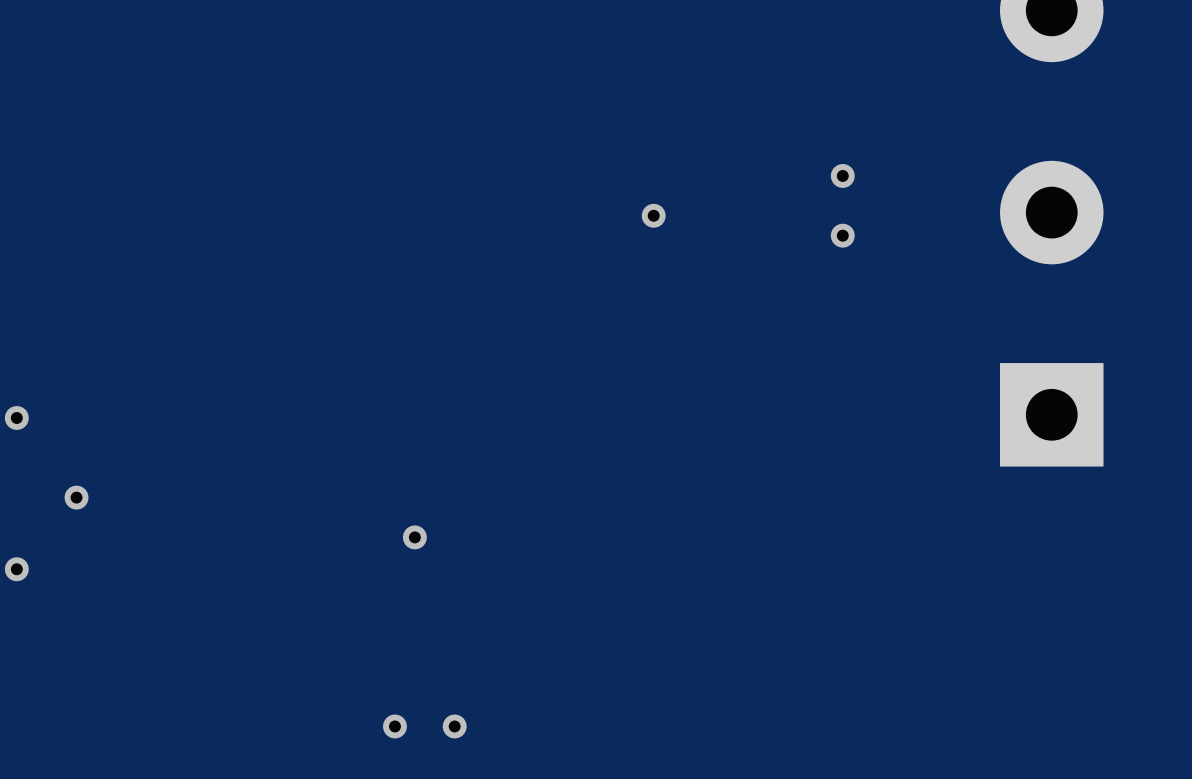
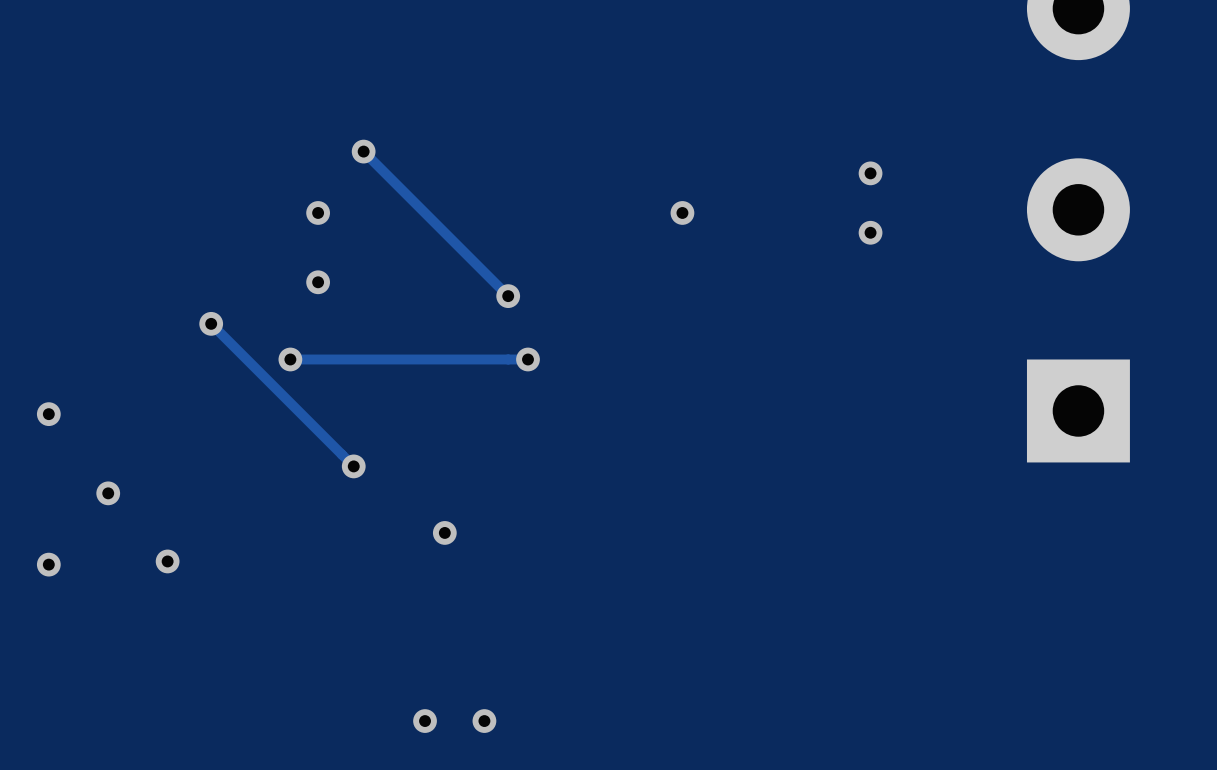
track: none -> (363, 151) (508, 296)
via: none -> (363, 151)
via: none -> (318, 212)
via: none -> (318, 282)
via: none -> (508, 296)
track: none -> (211, 323) (353, 466)
via: none -> (211, 323)
via: none -> (290, 359)
track: none -> (527, 359) (290, 359)
via: none -> (527, 359)
via: none -> (353, 466)
via: none -> (167, 561)

